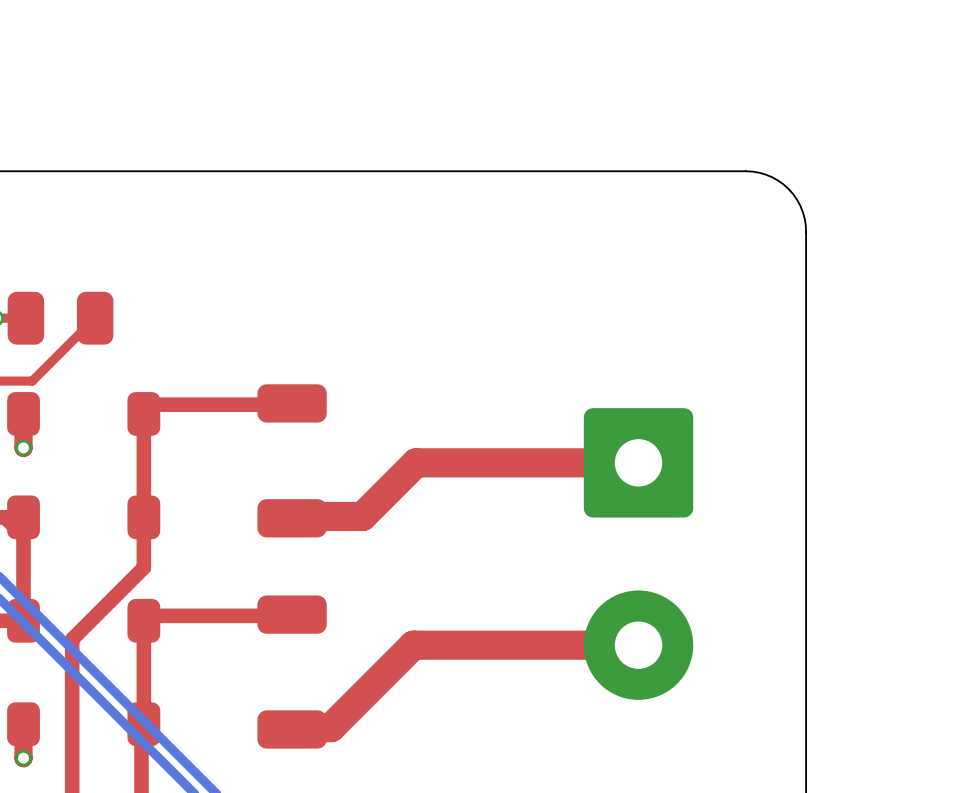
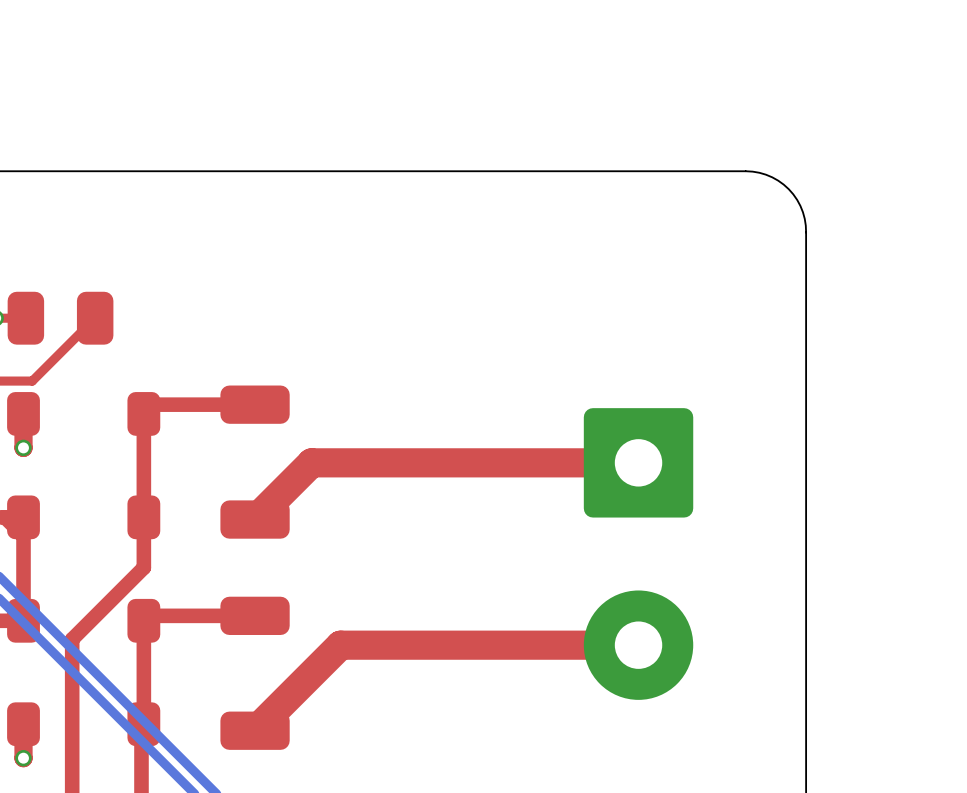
part position: (292, 460) -> (255, 462)
top track: (416, 462) (362, 516) (293, 516) (292, 518) -> (416, 462) (311, 462) (255, 519)
top track: (413, 645) (330, 727) (293, 727) (292, 729) -> (413, 645) (340, 645) (255, 730)
part position: (292, 672) -> (255, 673)

